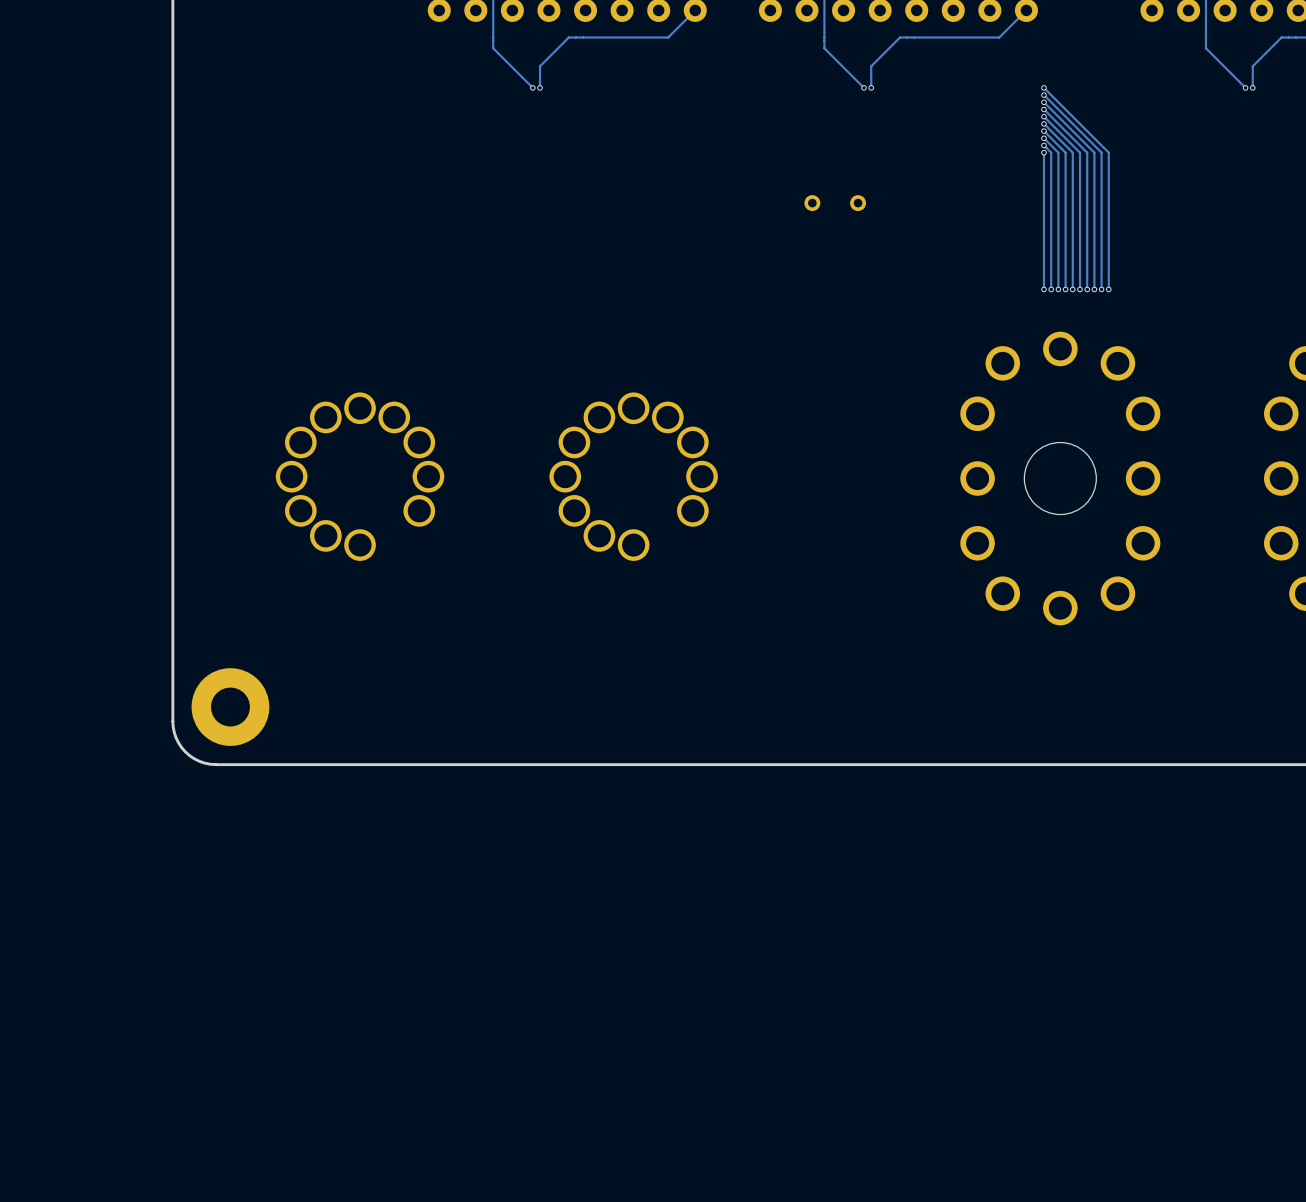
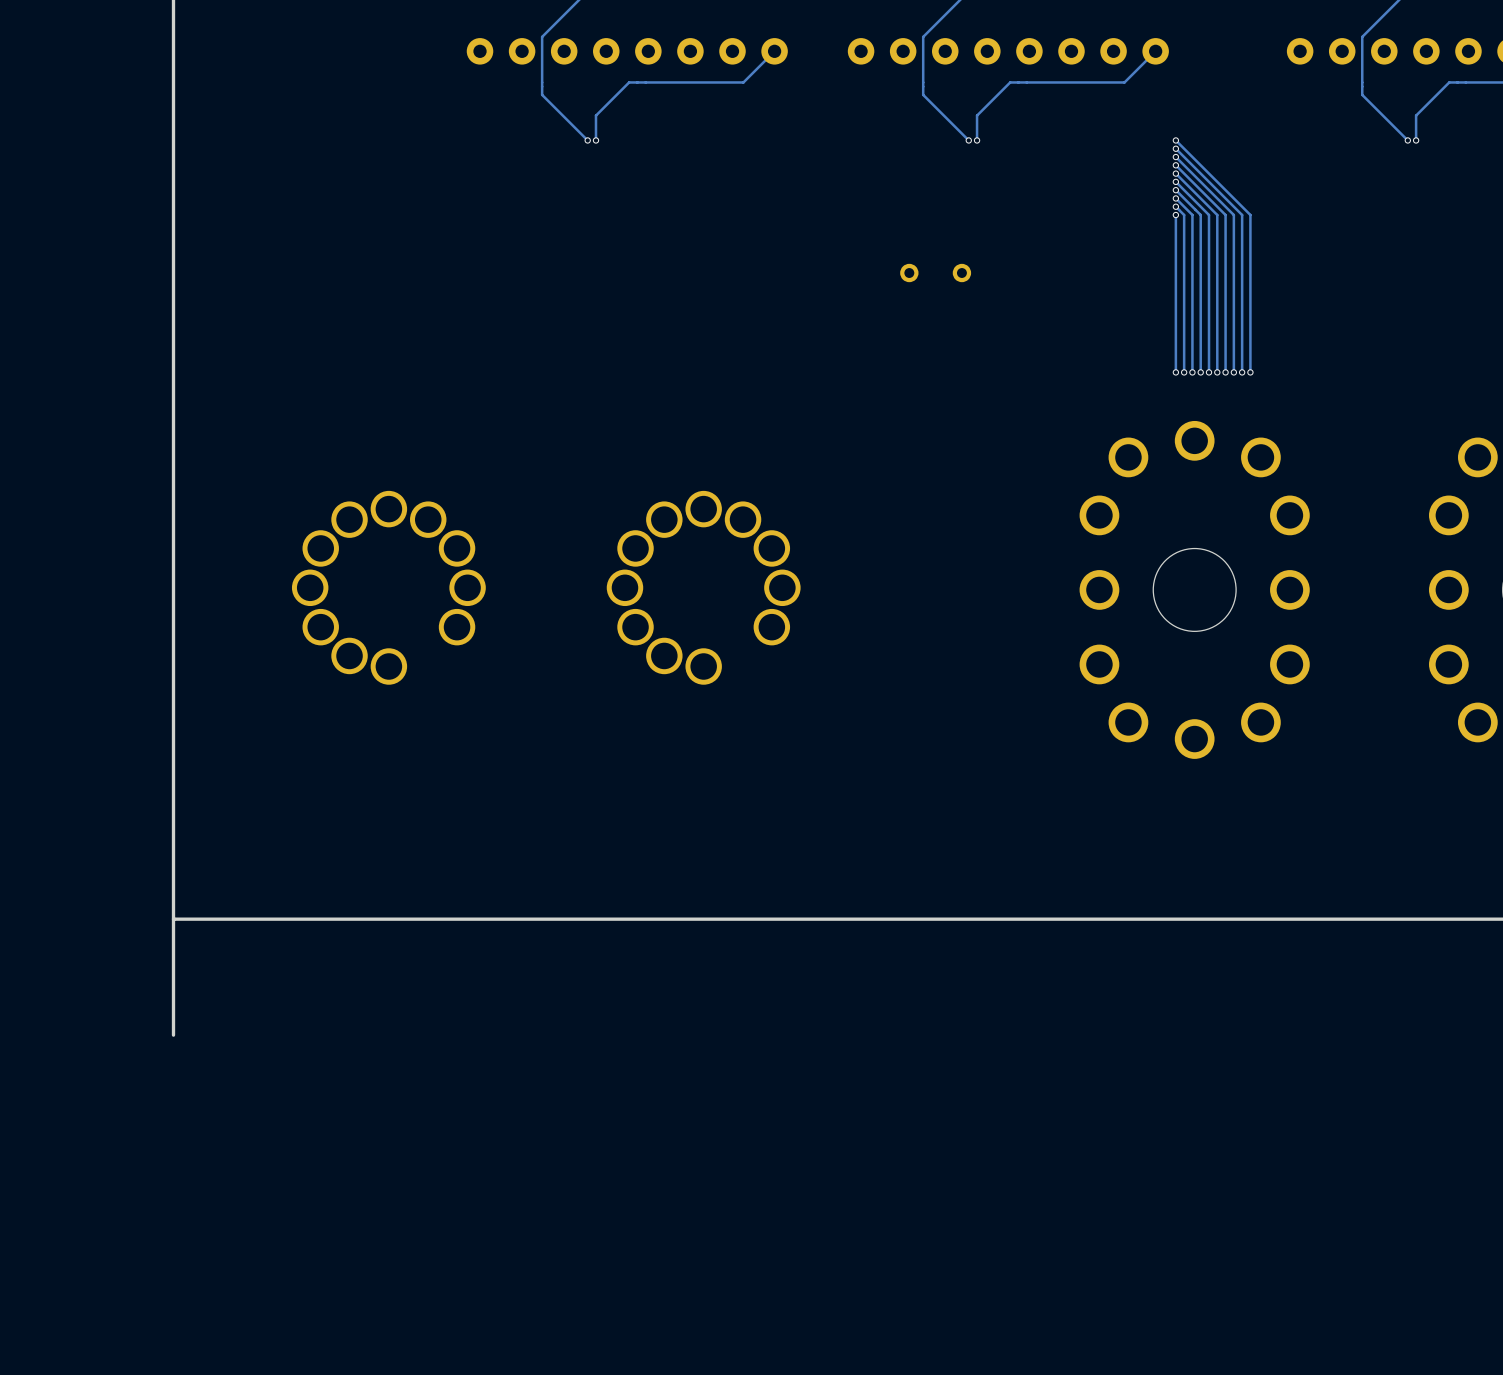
part: (230, 707) -> none
board edge: (172, 721) (176, 737) (185, 751) (199, 761) (216, 764) -> (173, 919) (223, 919)
board edge: none -> (173, 869) (173, 1035)

